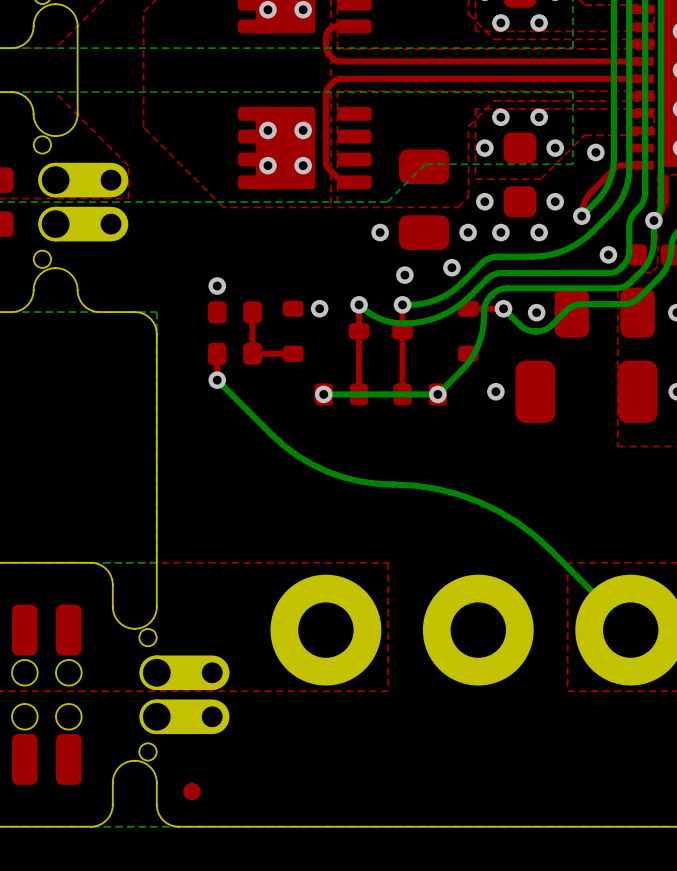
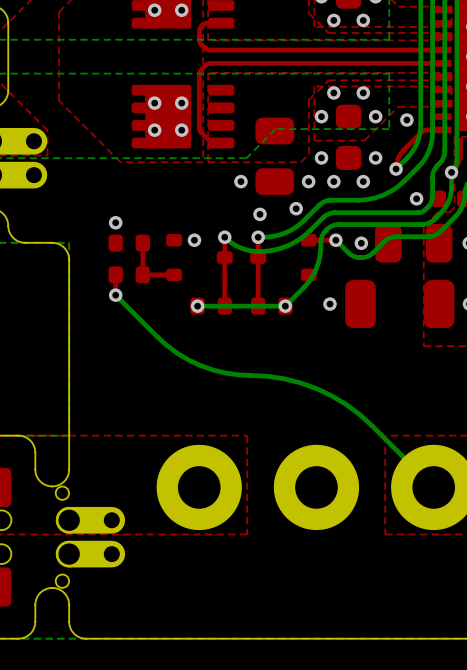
part: (191, 791) -> none

